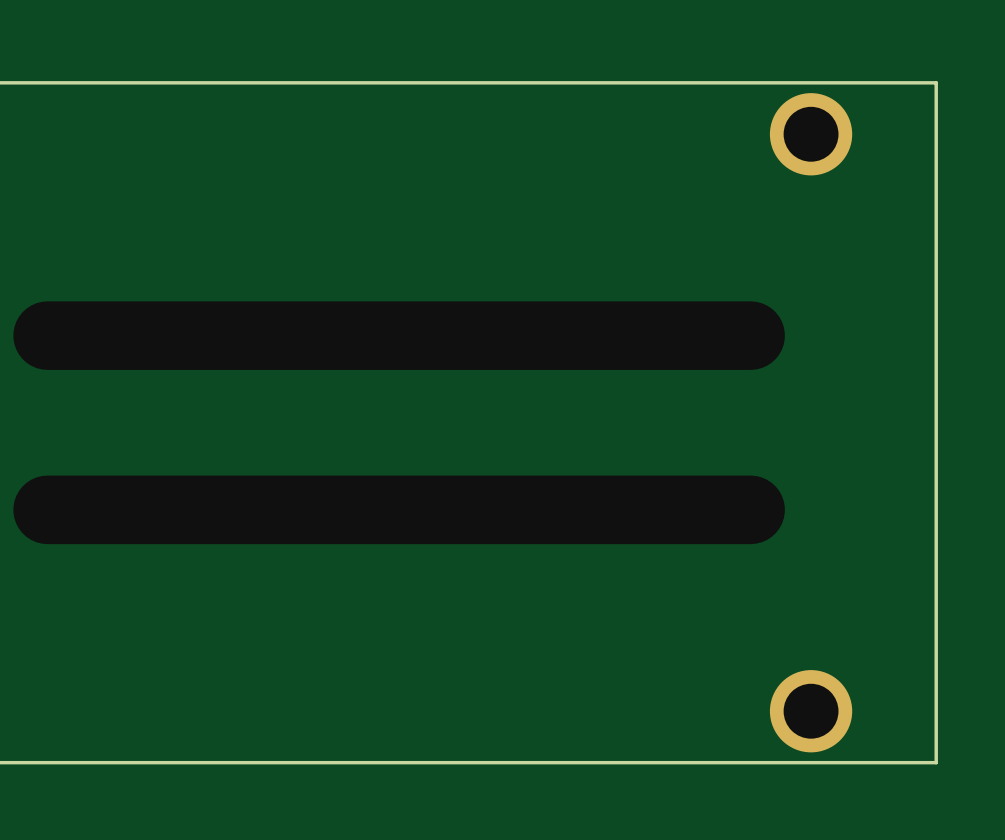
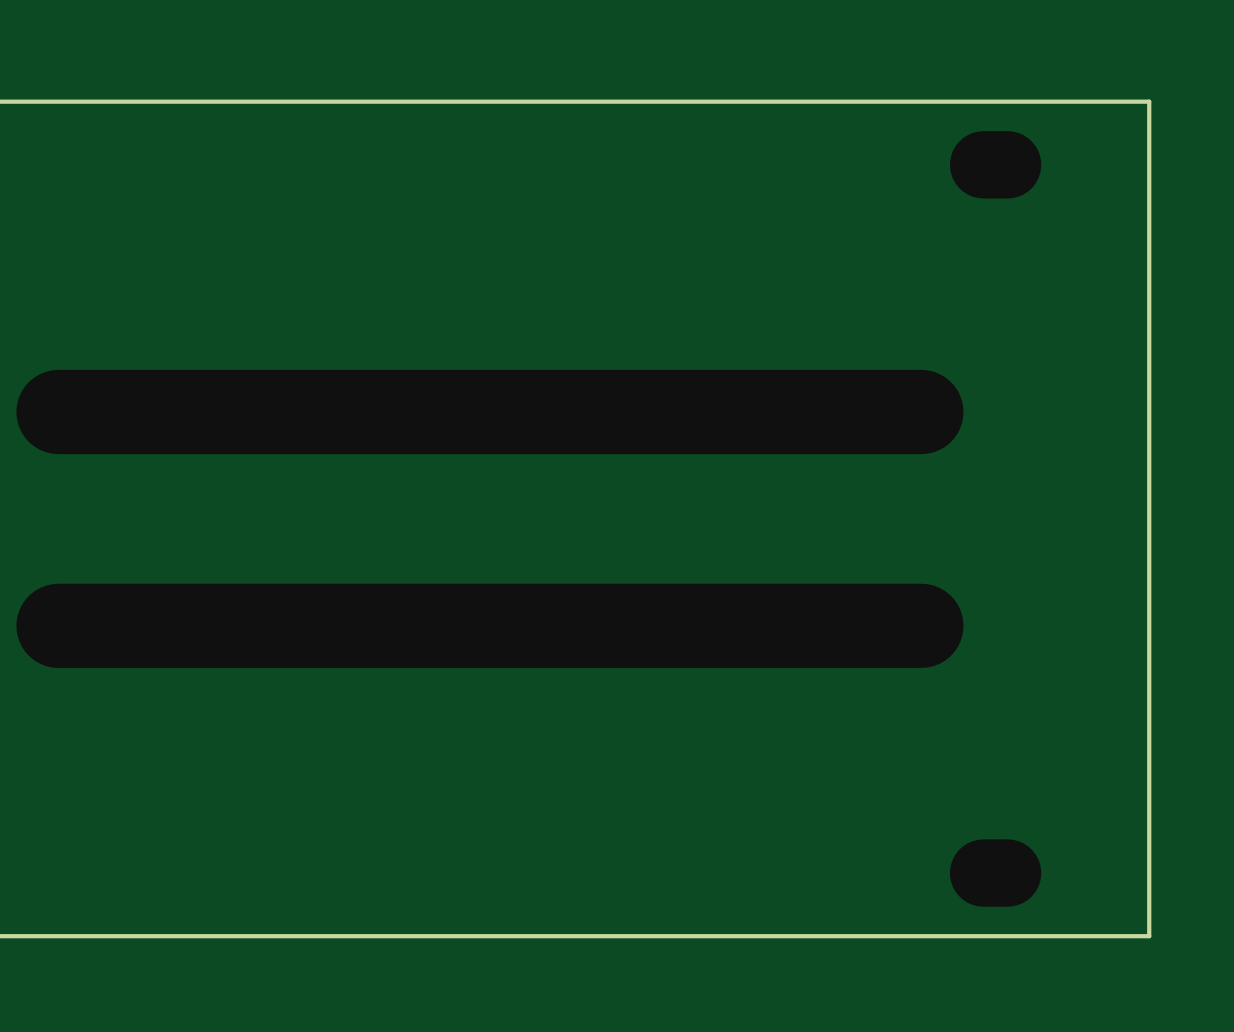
part footprint: [769, 93, 853, 176] -> [949, 131, 1042, 199]
part footprint: [769, 670, 853, 753] -> [949, 839, 1042, 907]

